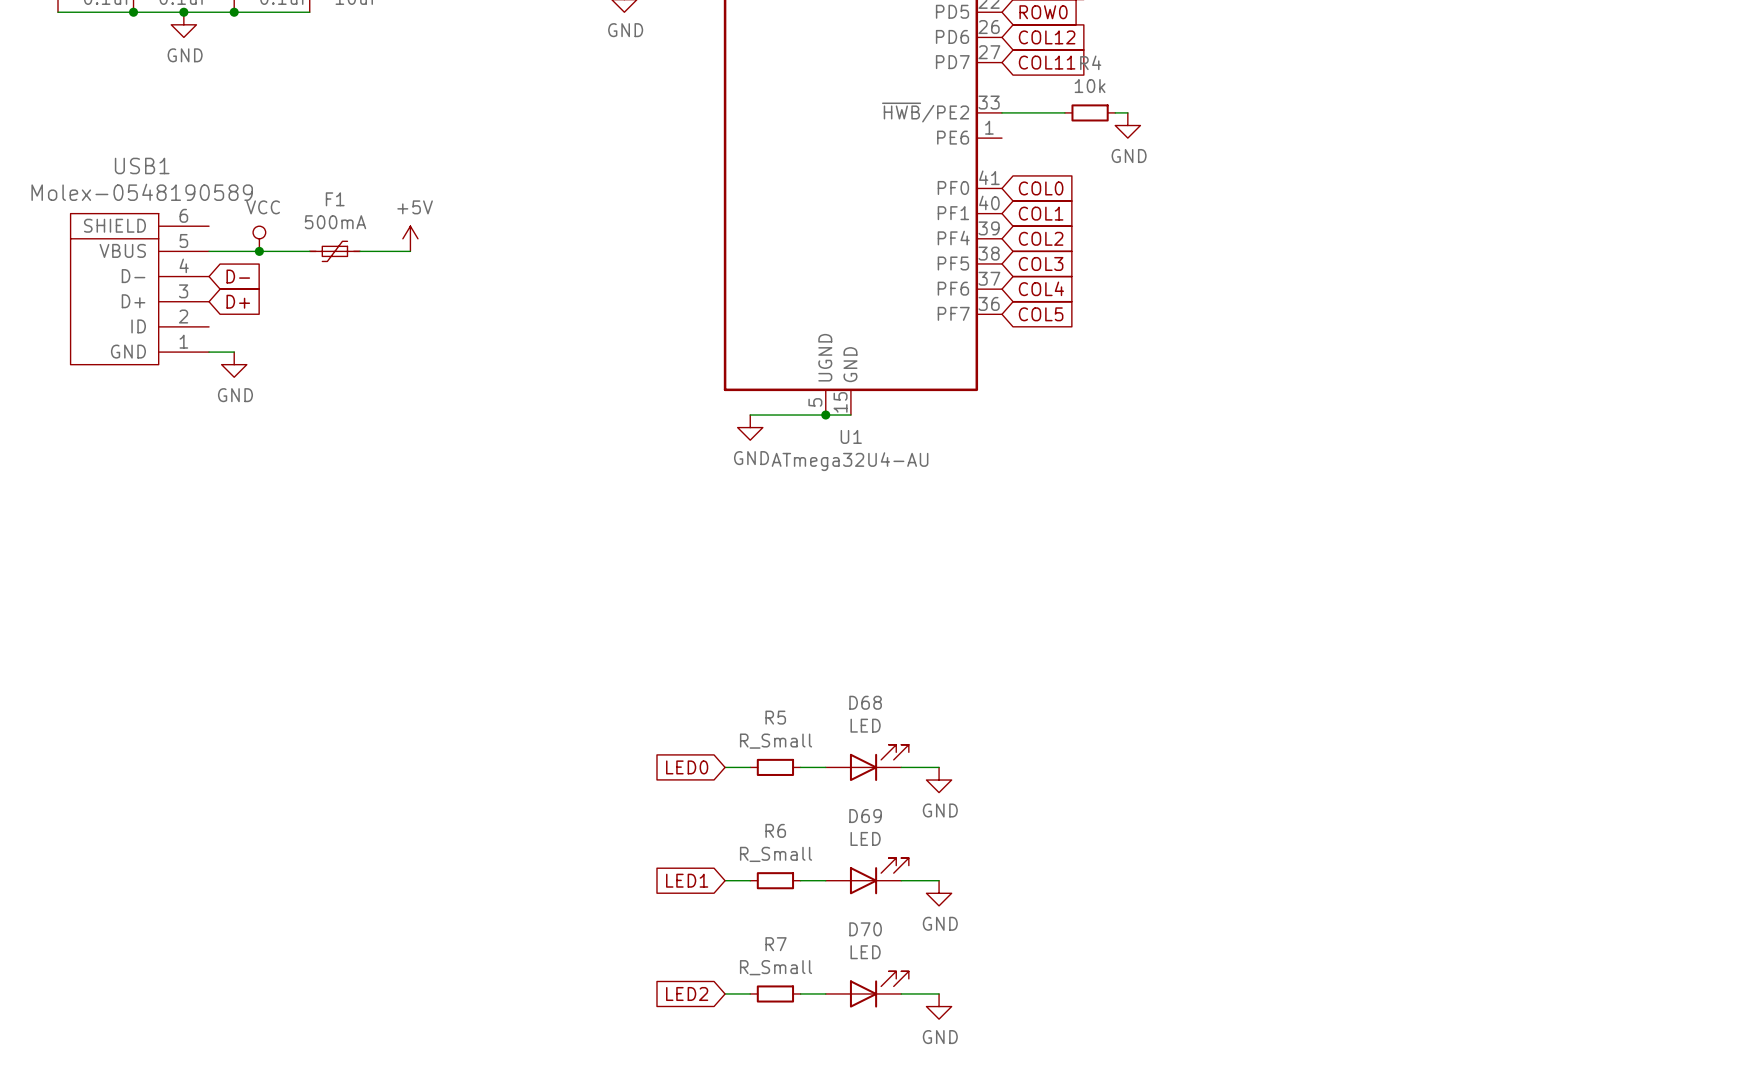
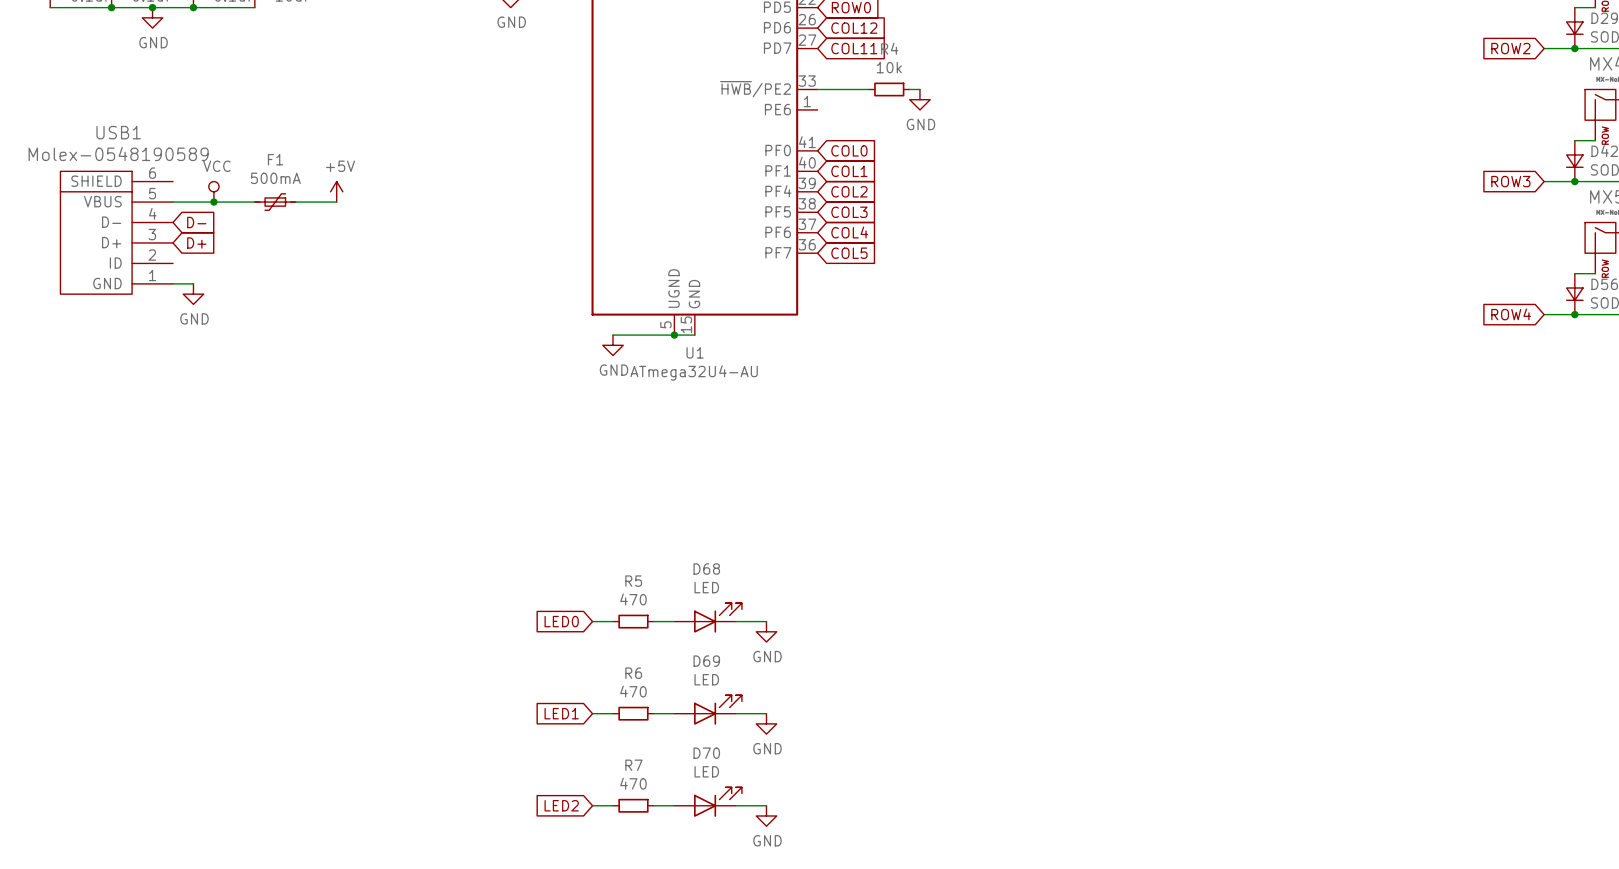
R5 value: R_Small (776, 741) -> 470 (633, 599)
R6 value: R_Small (776, 854) -> 470 (633, 691)
R7 value: R_Small (776, 967) -> 470 (633, 783)

